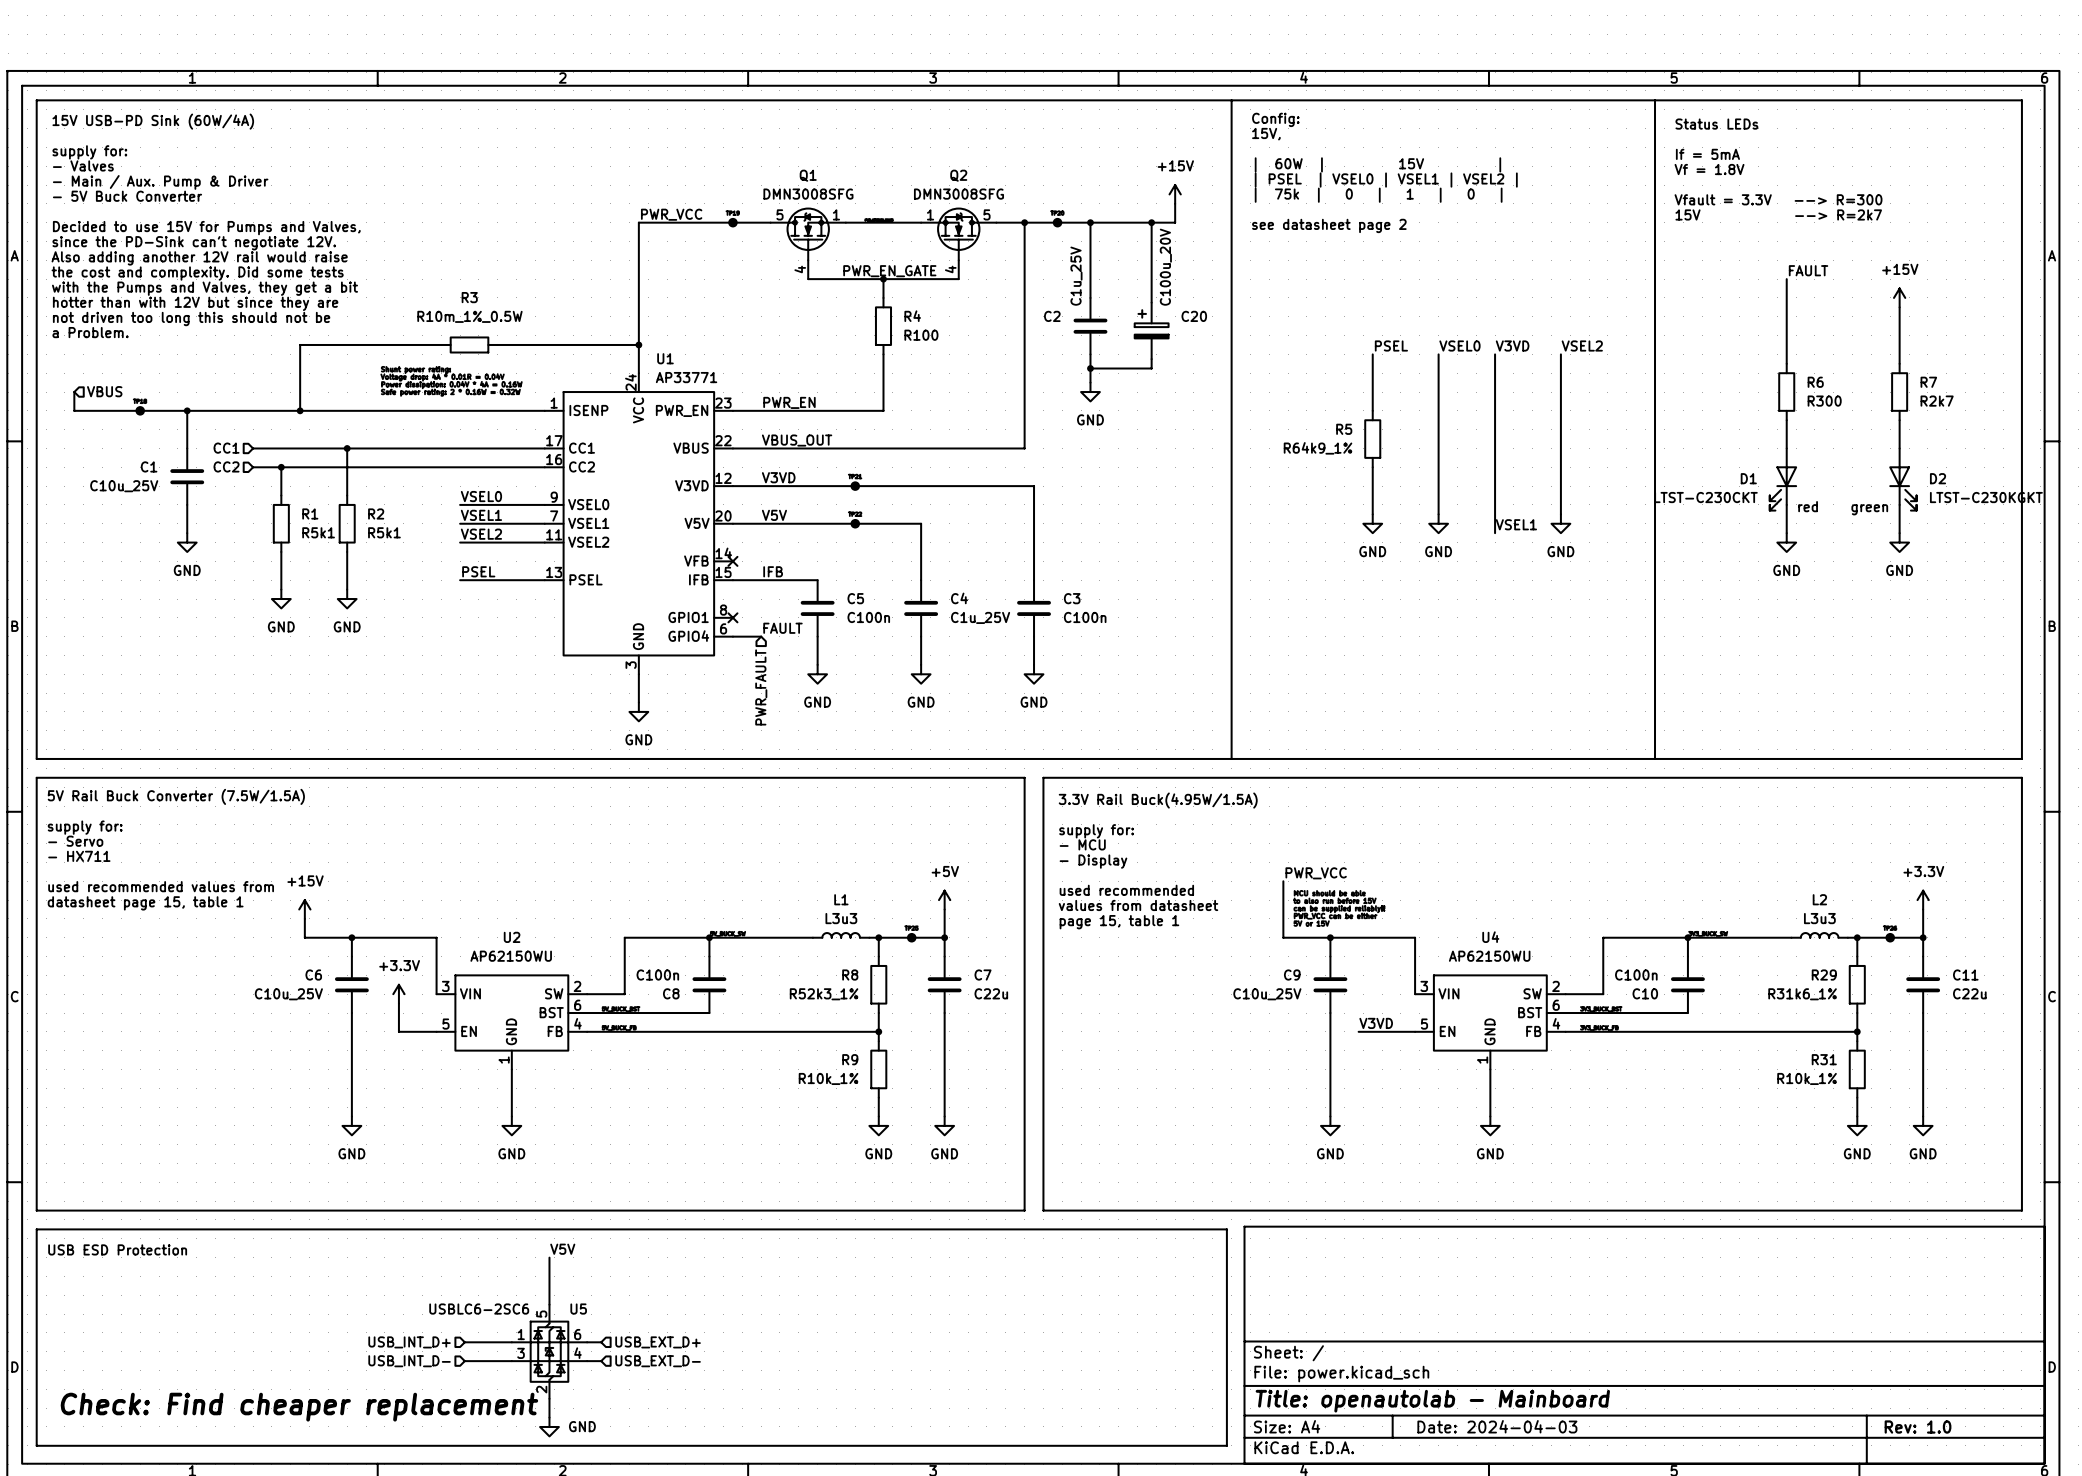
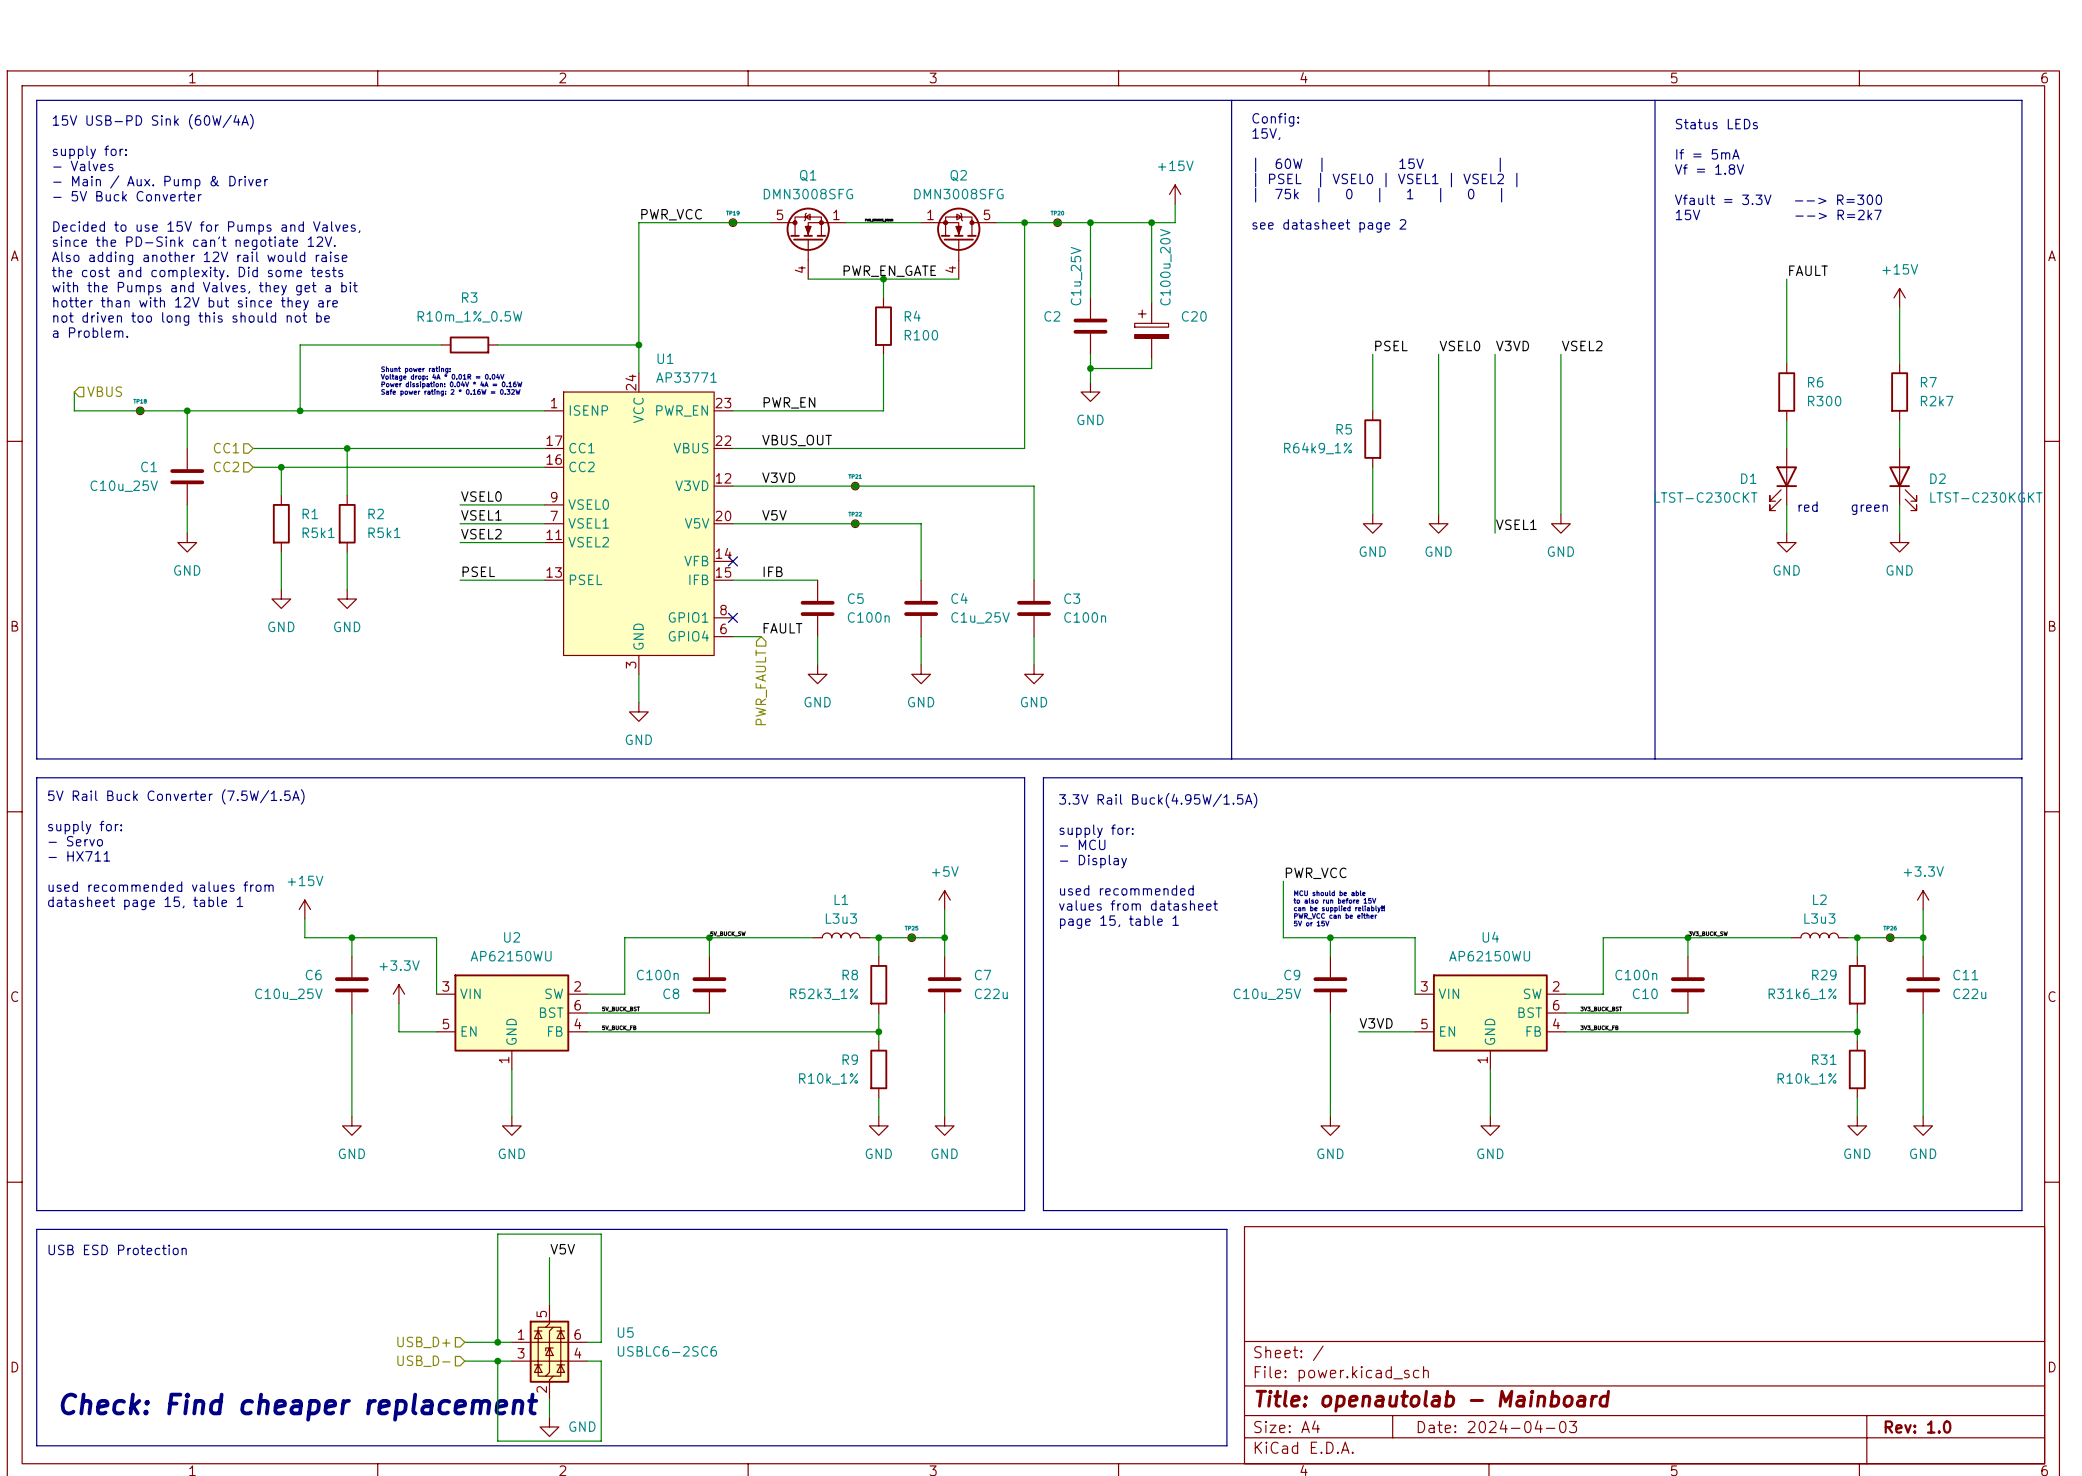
U5 value position: USBLC6-2SC6 (479, 1309) -> USBLC6-2SC6 (667, 1351)
U5 name position: U5 (578, 1309) -> U5 (625, 1332)
hierarchical label: USB_INT_D+ (409, 1342) -> USB_D+ (423, 1342)
wire: none -> (497, 1342) (497, 1234) (601, 1234) (601, 1342)
junction: none -> (497, 1342)
hierarchical label: USB_EXT_D+ (658, 1342) -> none
hierarchical label: USB_INT_D- (409, 1361) -> USB_D- (423, 1361)
wire: none -> (497, 1361) (497, 1441) (601, 1441) (601, 1361)
junction: none -> (497, 1361)
hierarchical label: USB_EXT_D- (658, 1361) -> none

